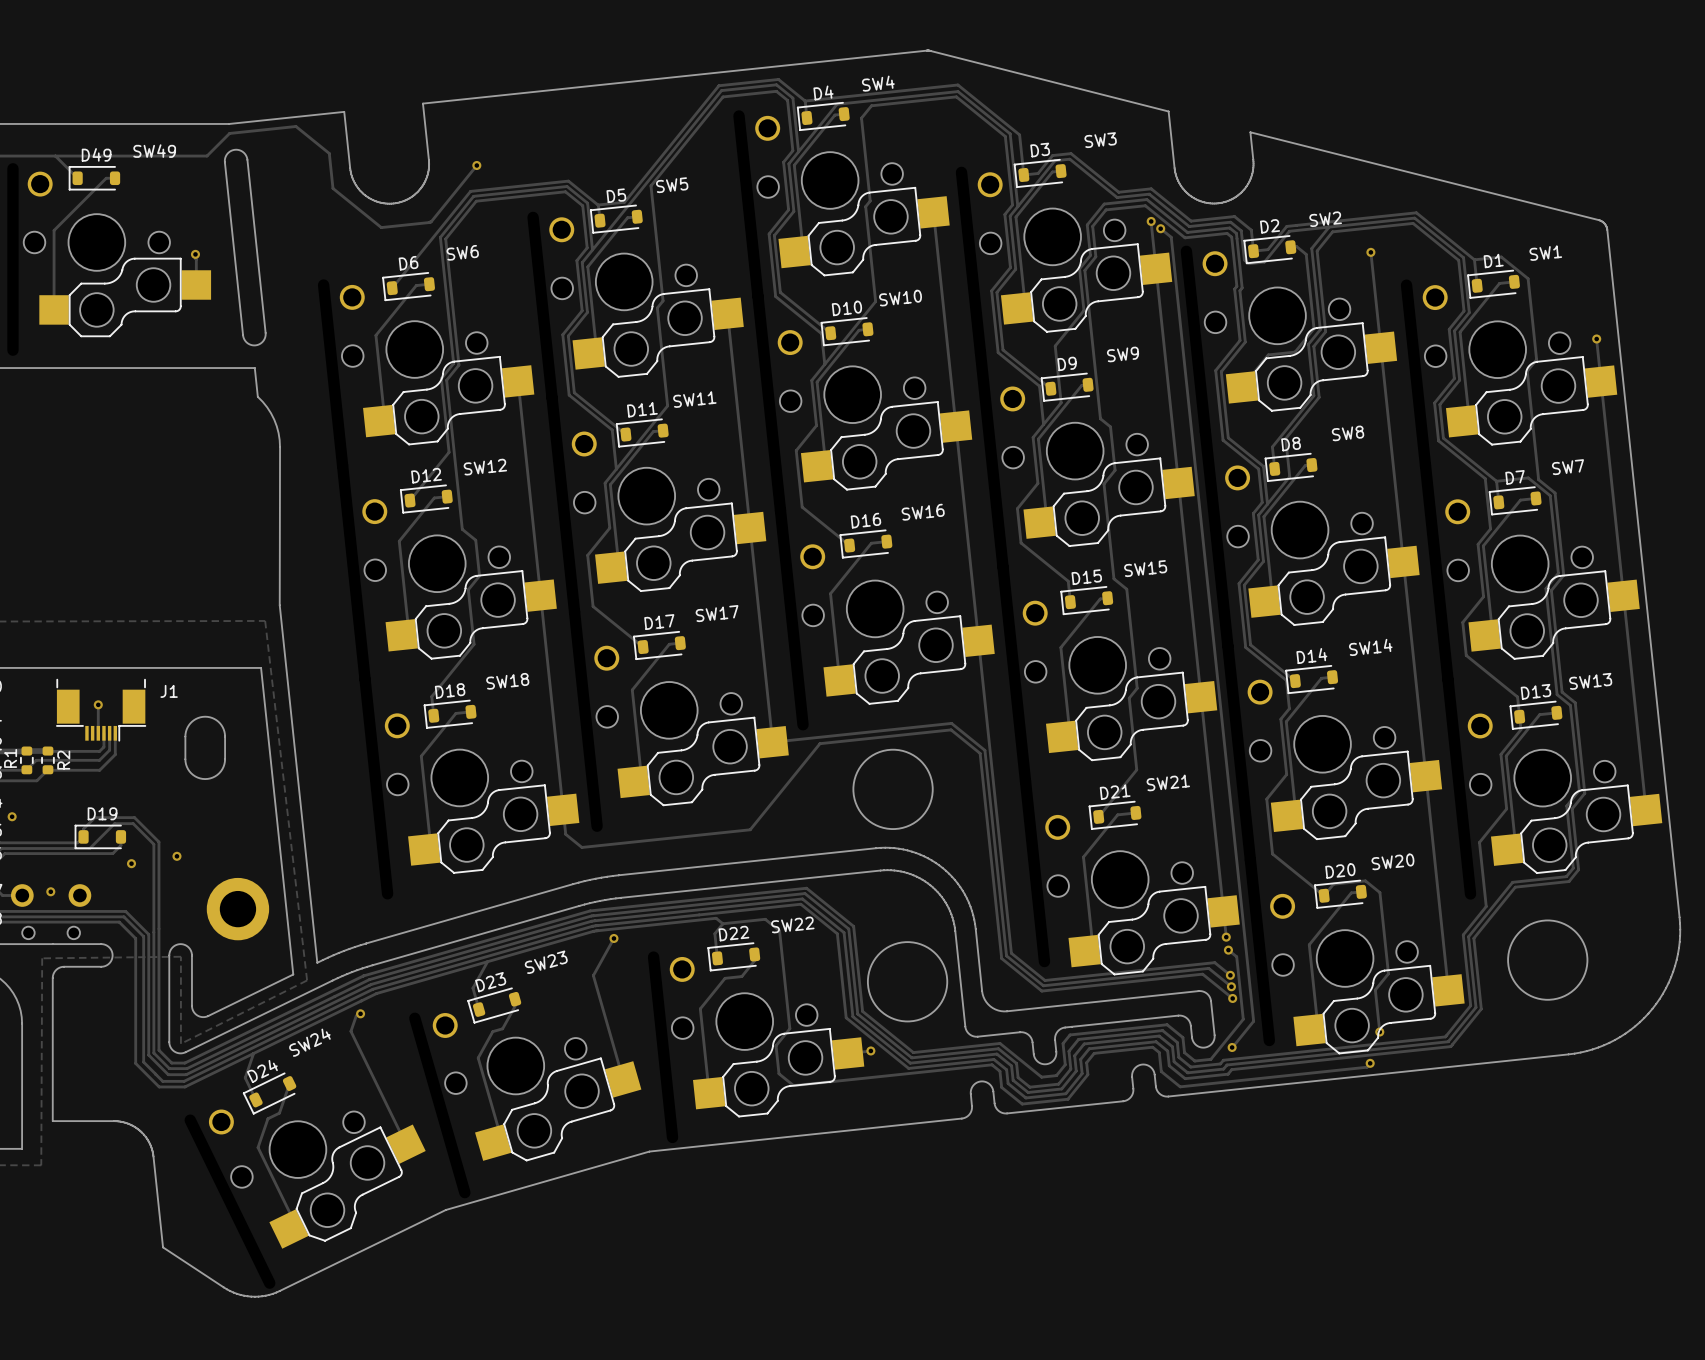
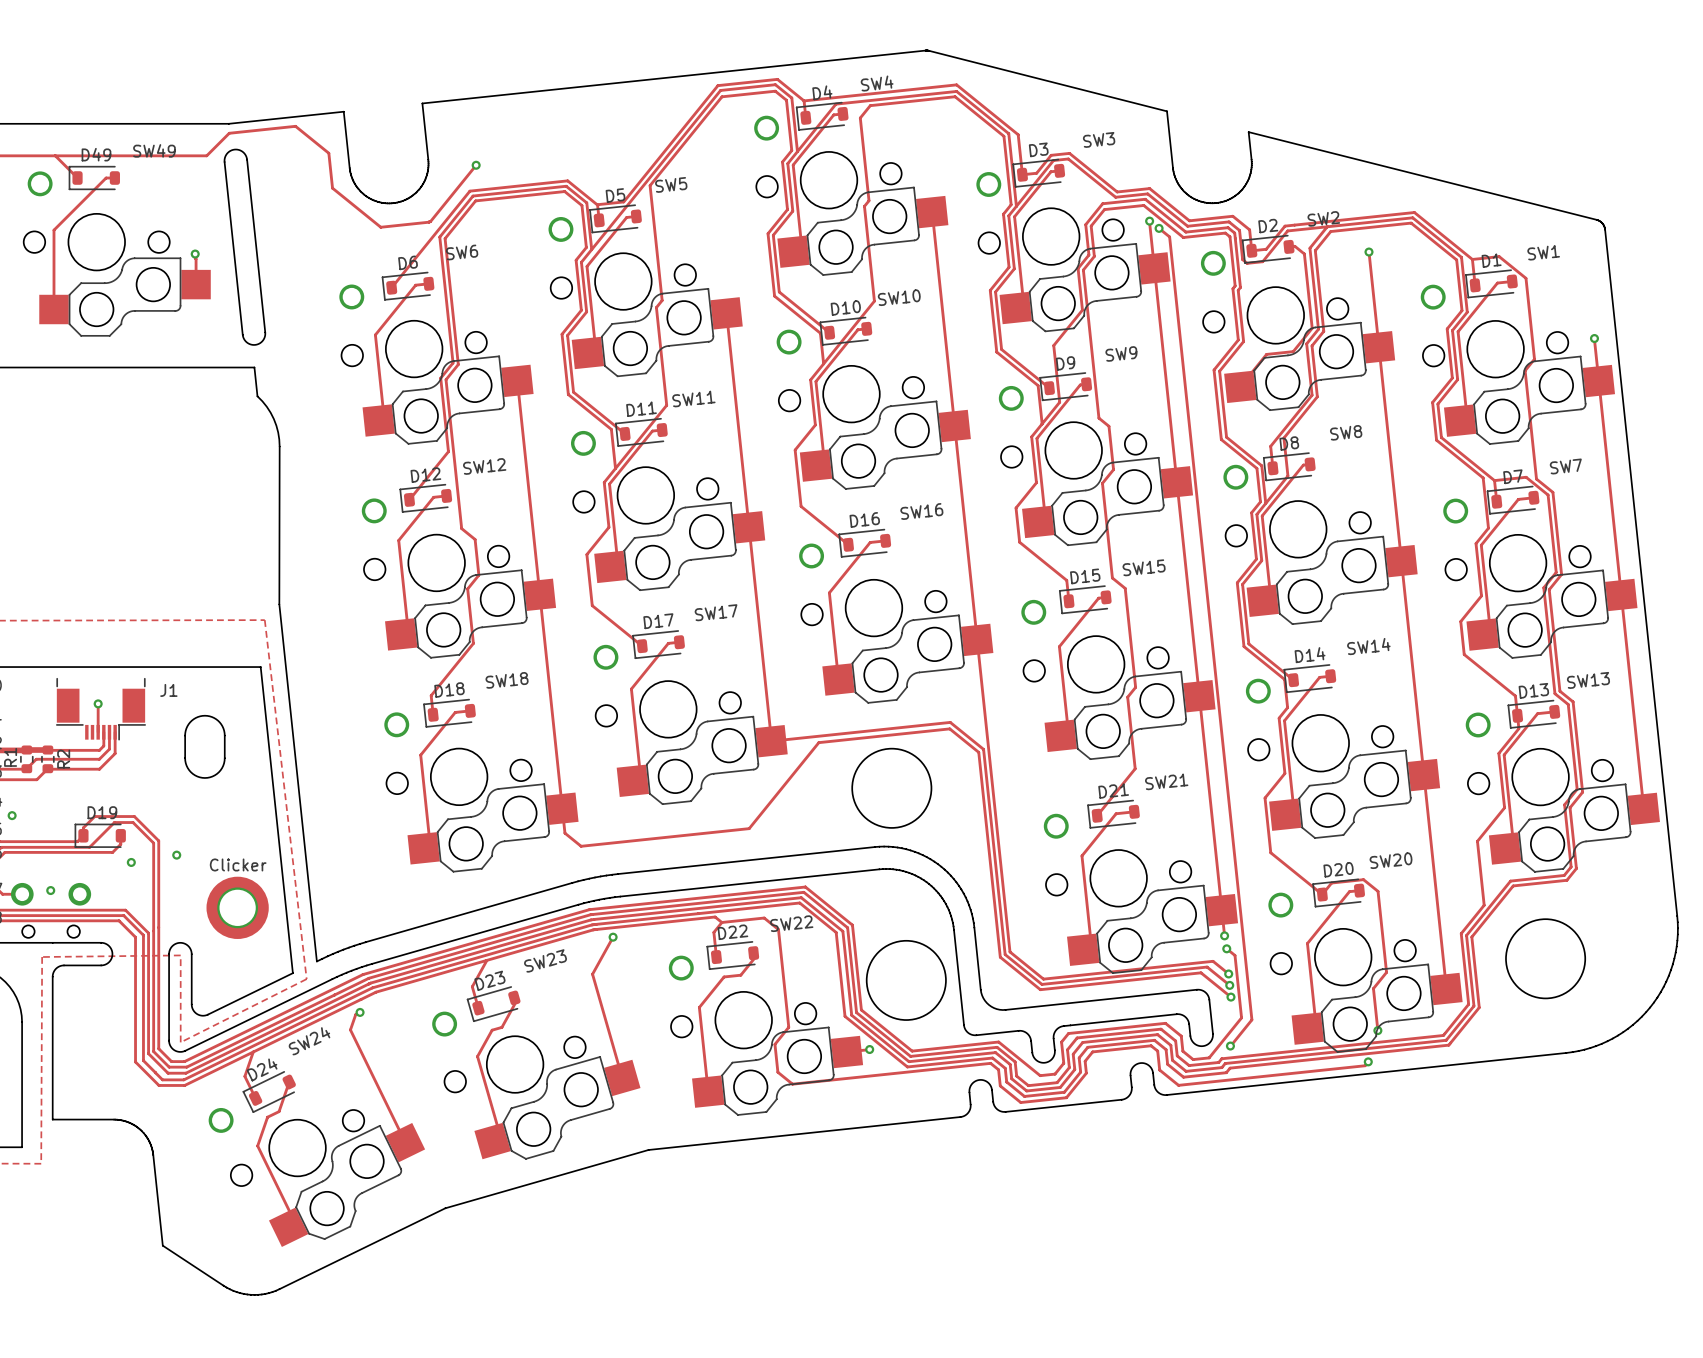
Clicker name: none -> Clicker (238, 864)

